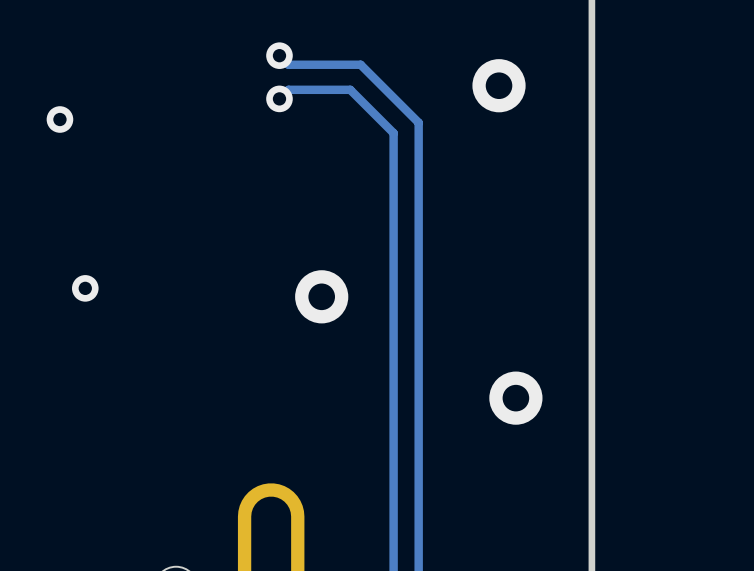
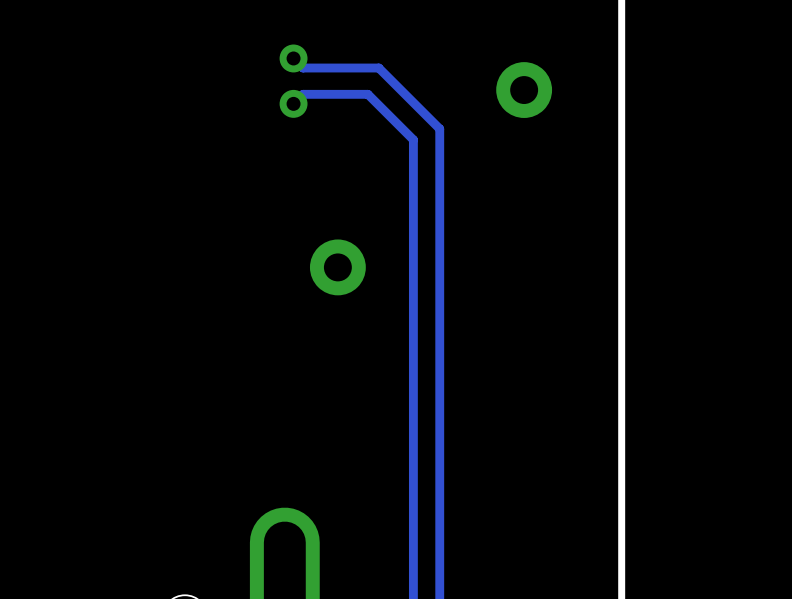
via: (59, 119) -> none
via: (85, 288) -> none
via position: (321, 296) -> (337, 267)
via: (515, 398) -> none

